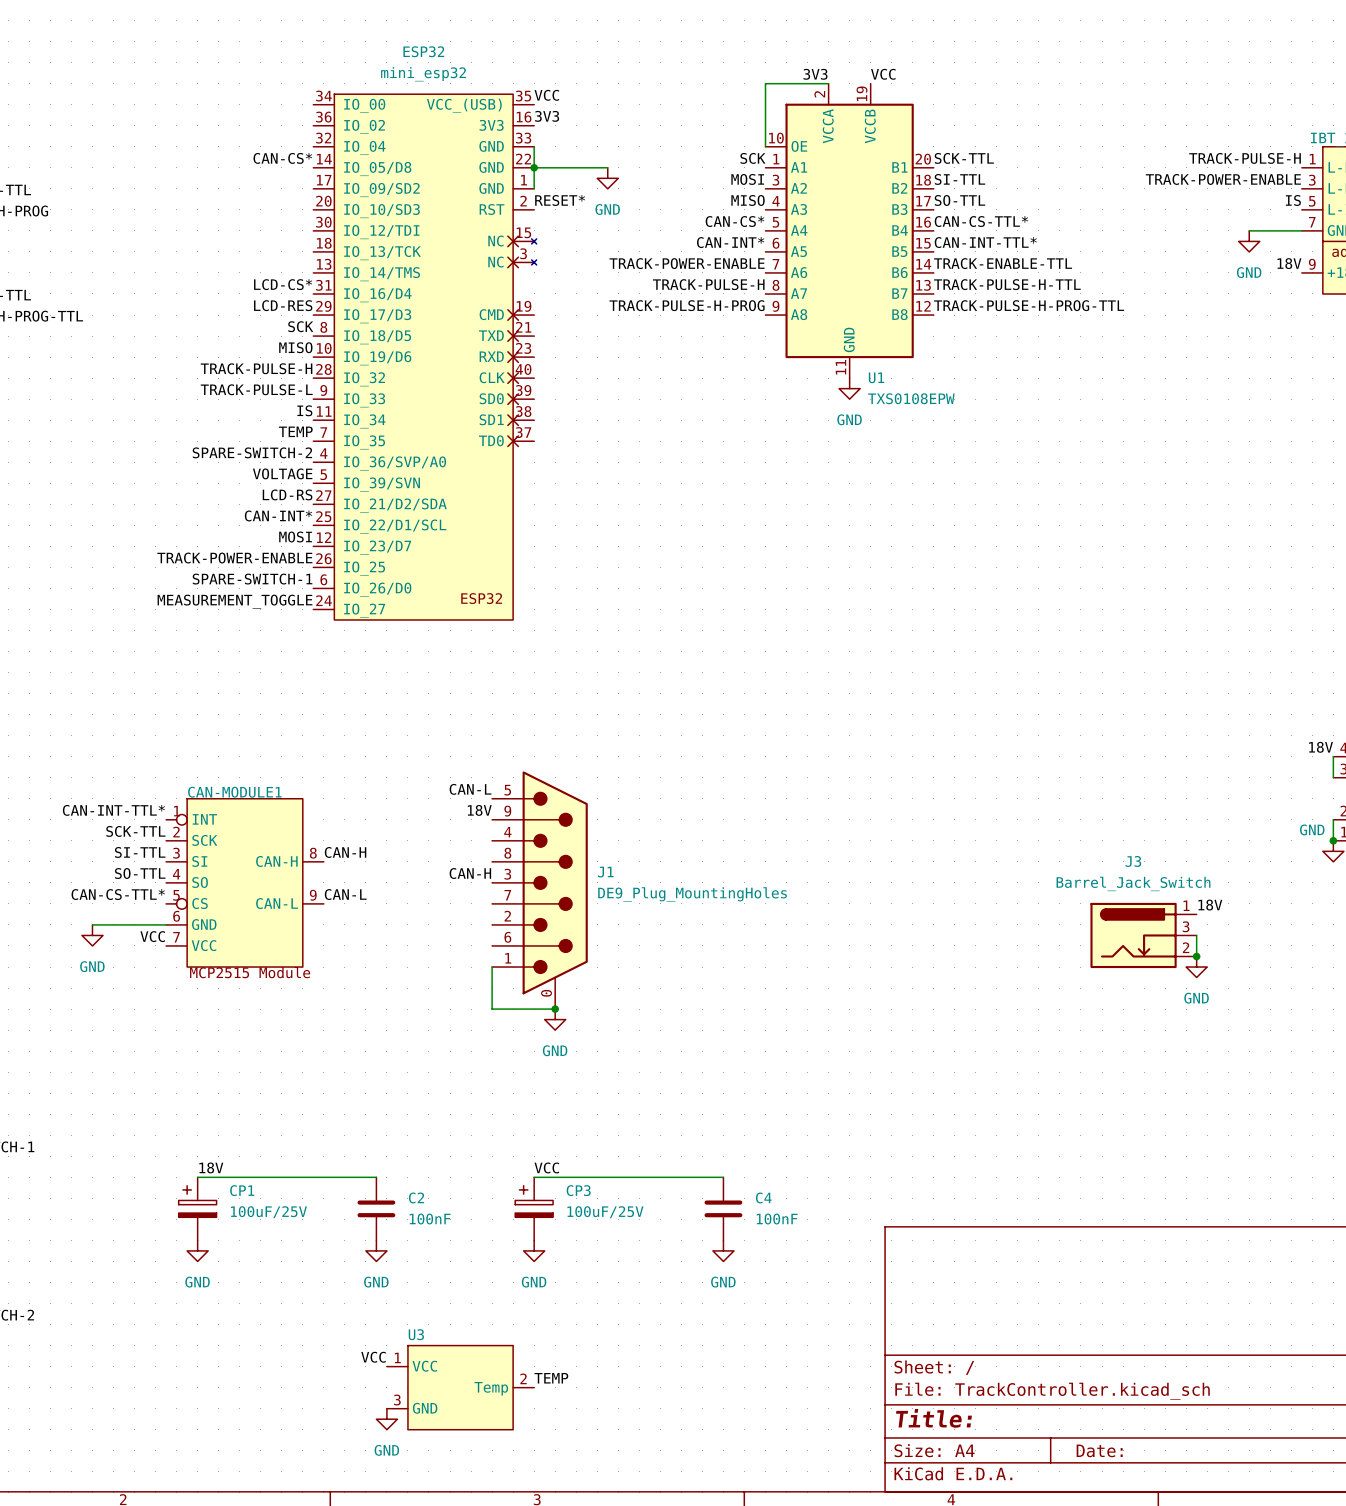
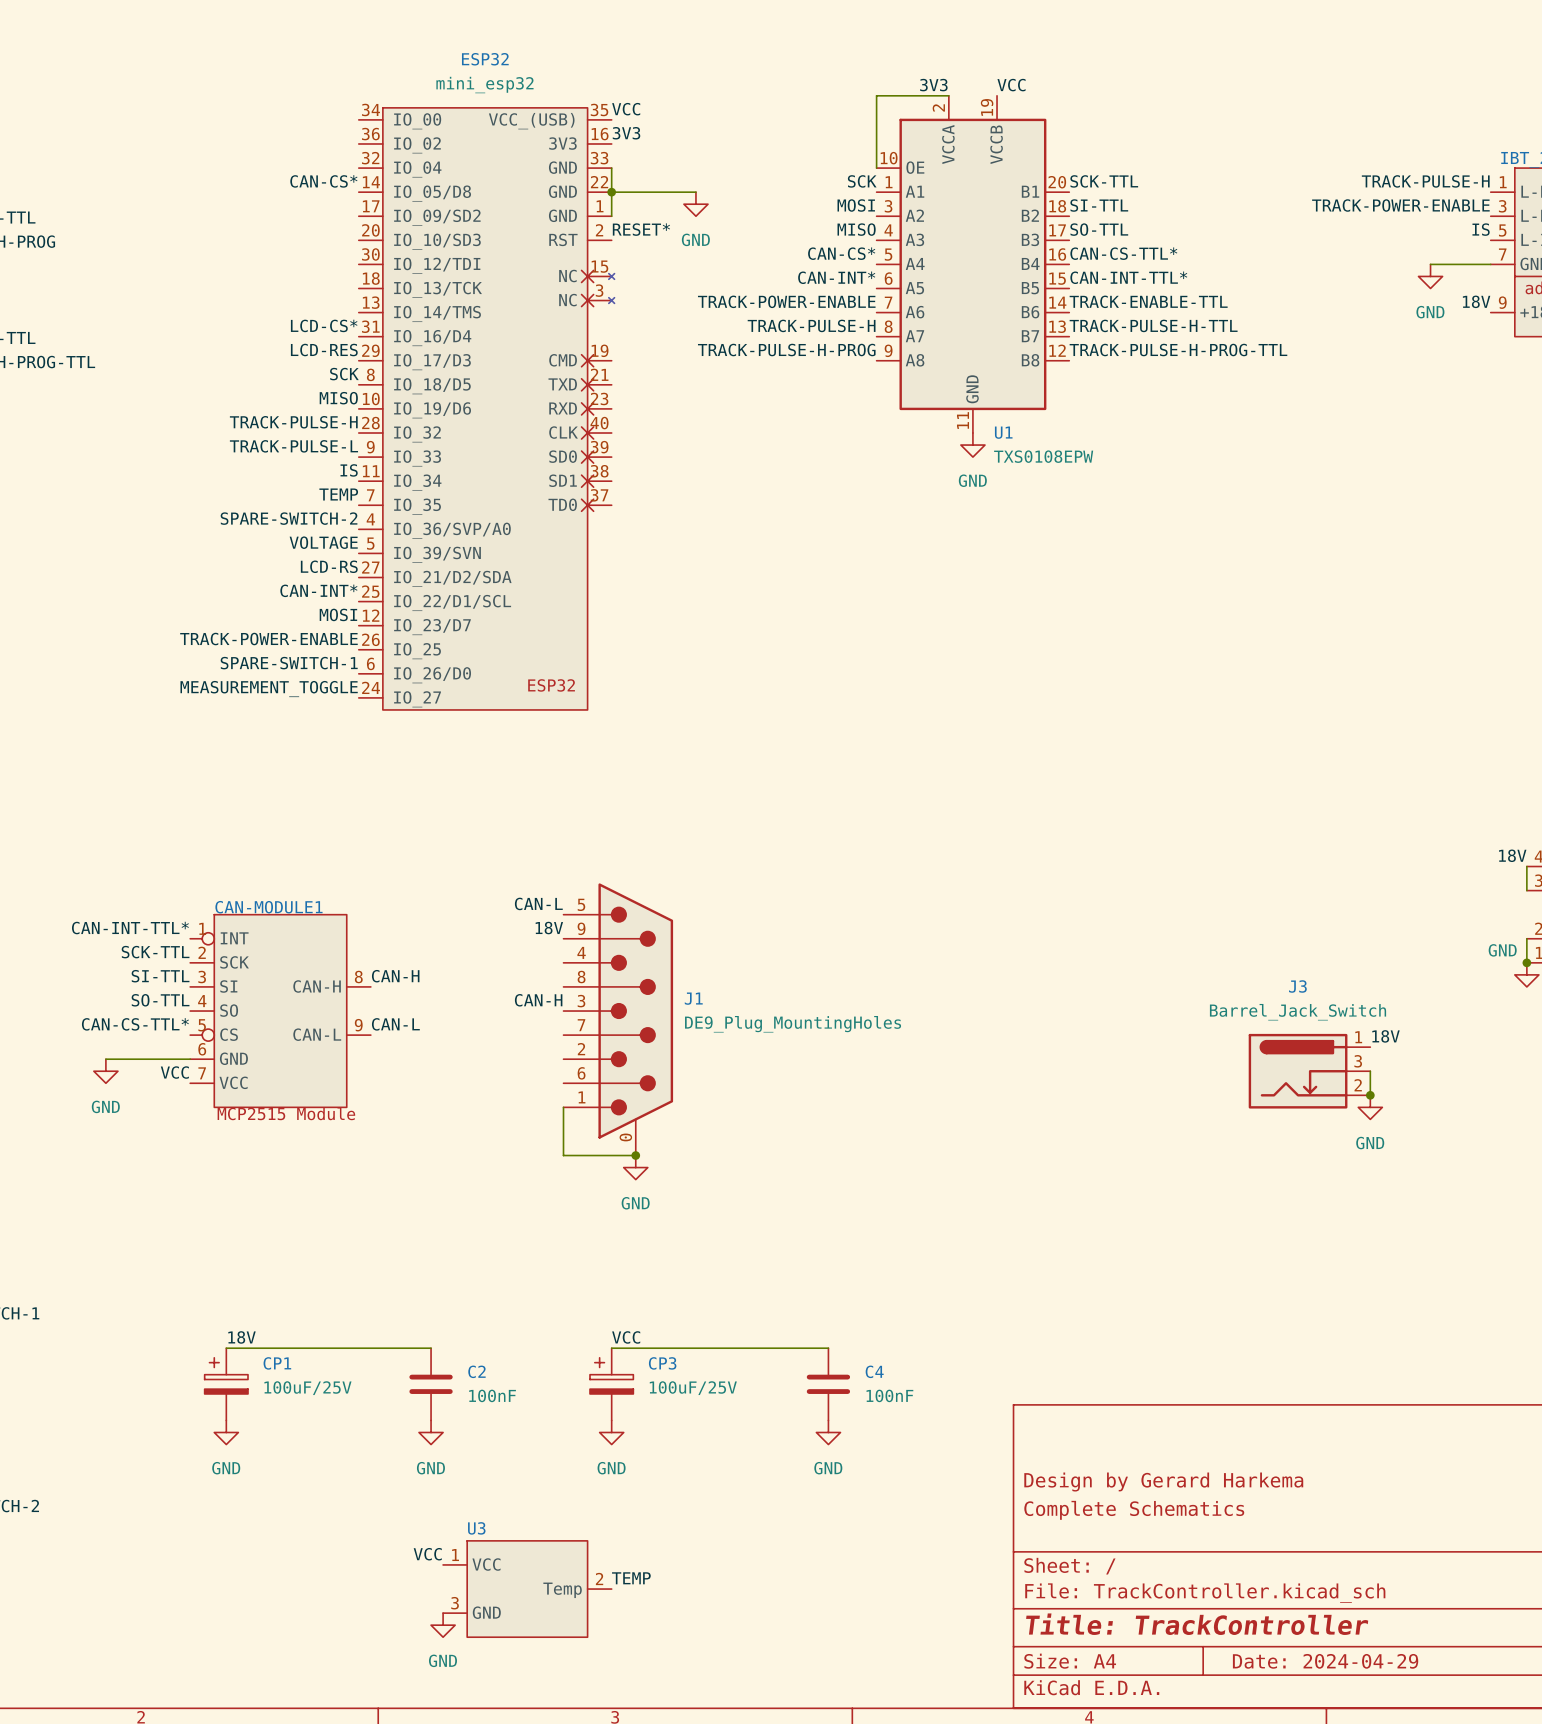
title block: none -> Design by Gerard Harkema (1163, 1482)
title block: none -> Complete Schematics (1134, 1510)
title block: Title: (933, 1418) -> Title: TrackController (1197, 1624)
title block: Date: (1099, 1450) -> Date: 2024-04-29 (1325, 1661)

